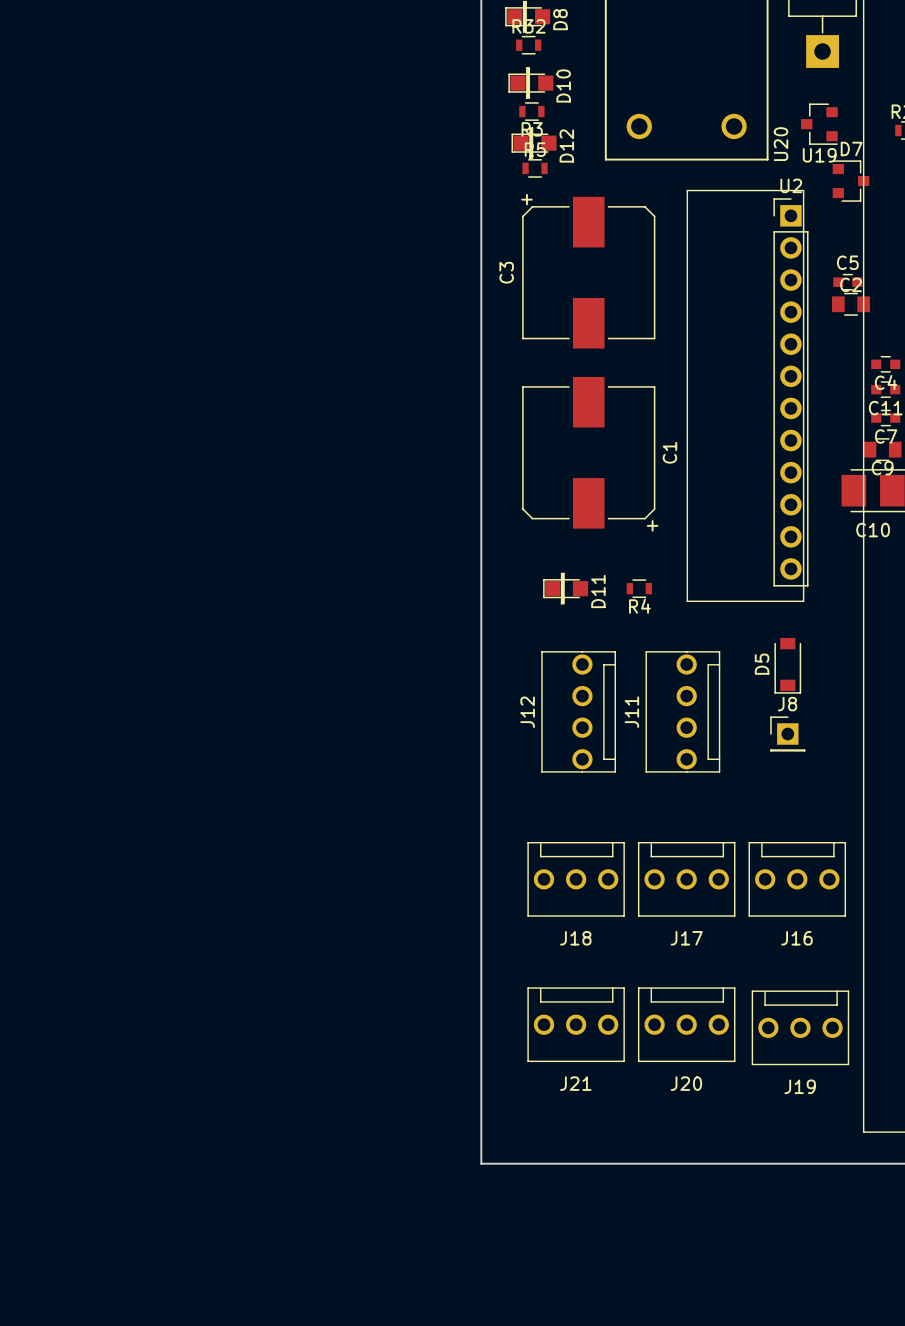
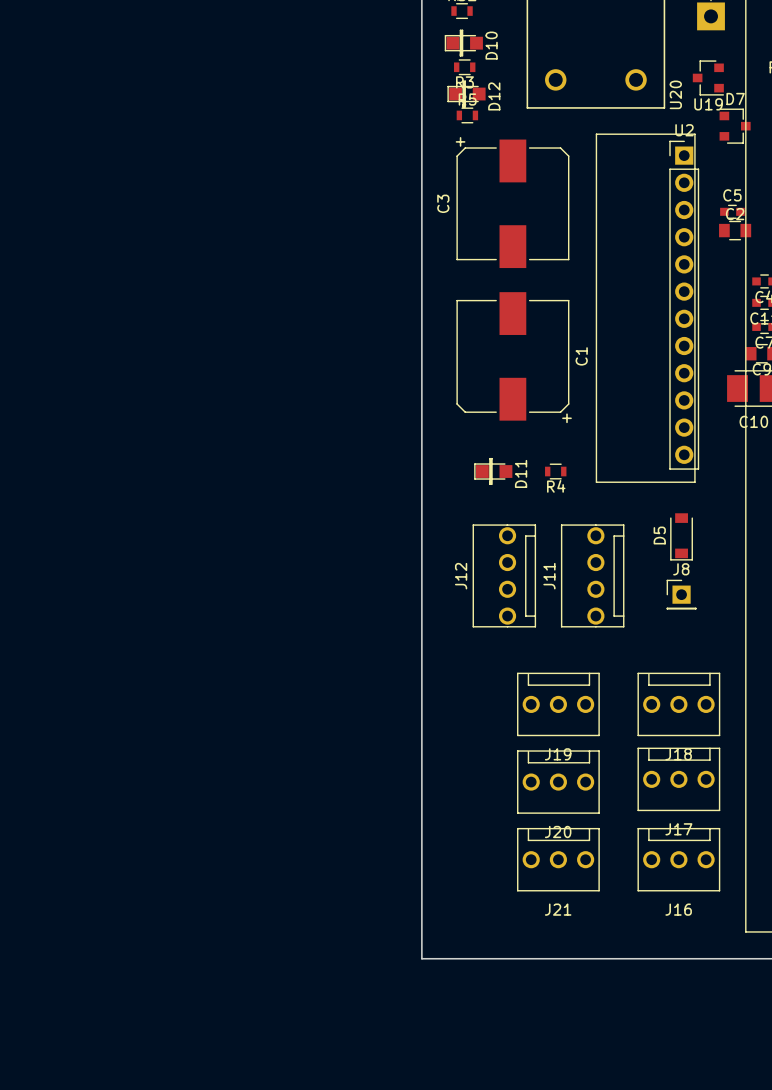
J18 position: (576, 879) -> (678, 704)
J17 position: (686, 879) -> (678, 779)
J16 position: (797, 879) -> (678, 859)
J21 position: (576, 1024) -> (558, 859)
J20 position: (686, 1024) -> (558, 782)
J19 position: (800, 1027) -> (558, 704)

